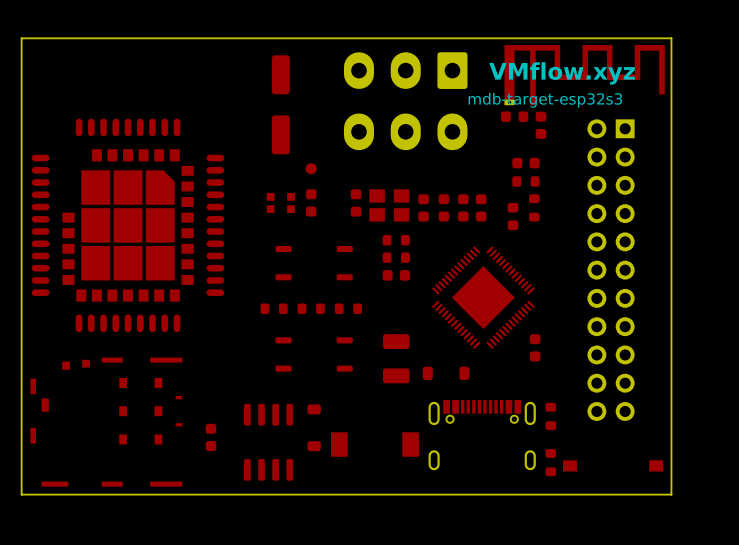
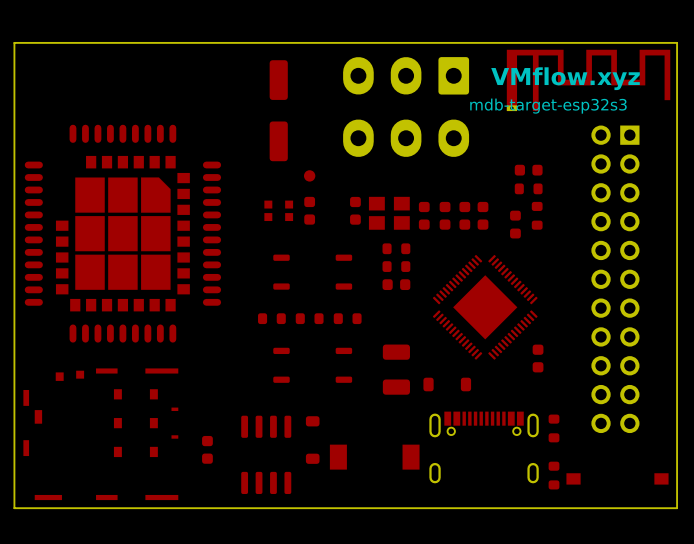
part: (514, 116) -> none
part: (540, 125) -> none

